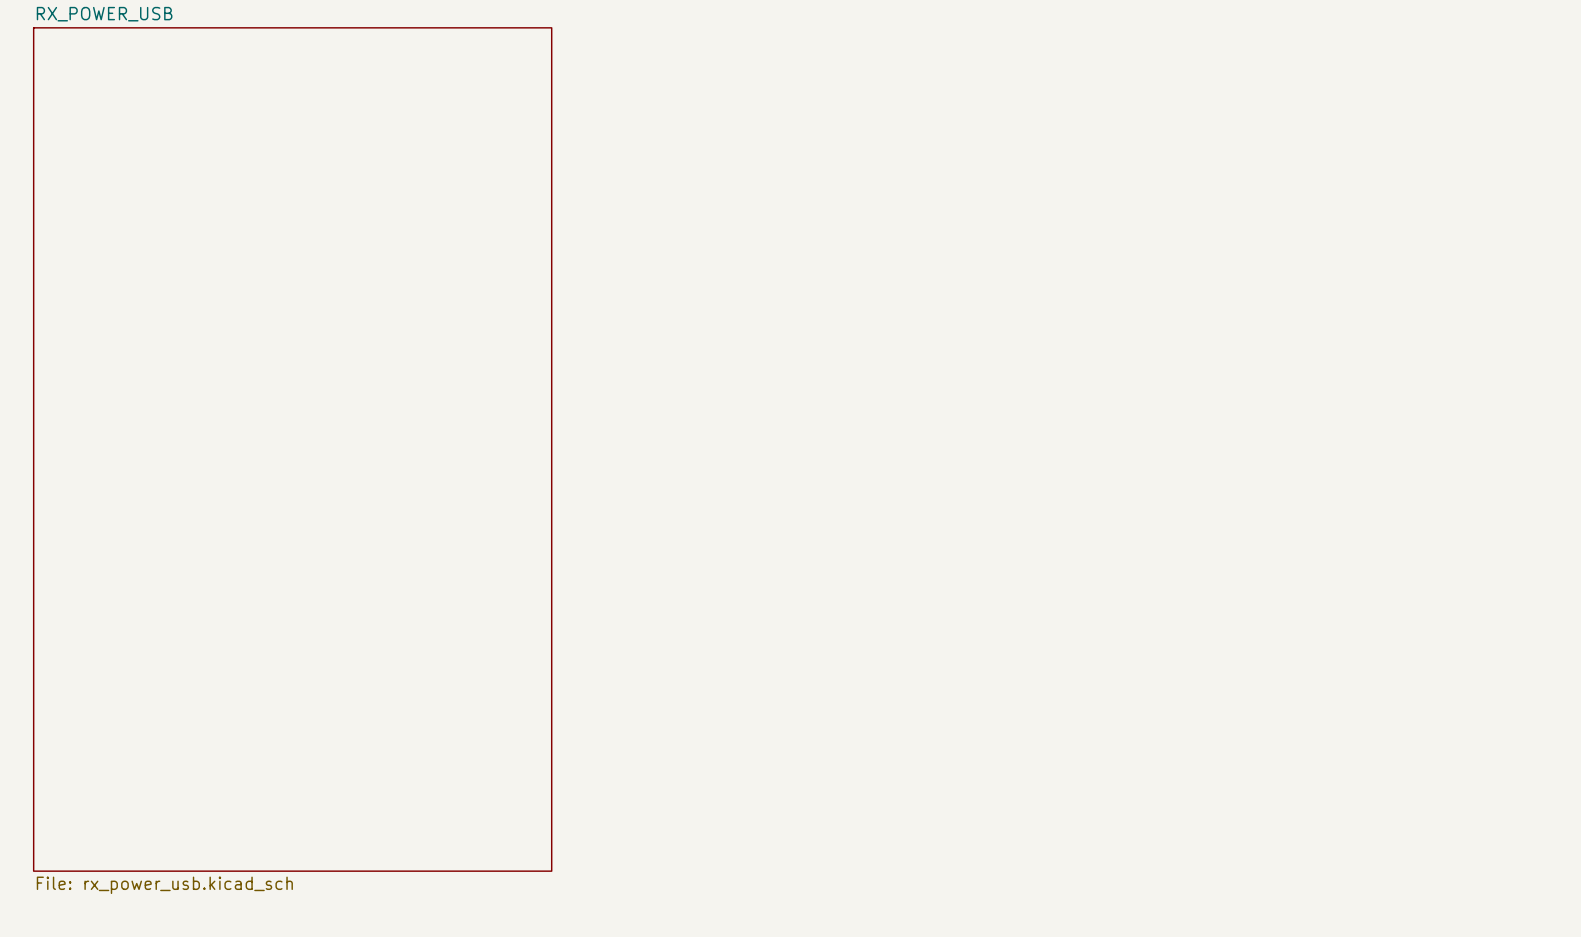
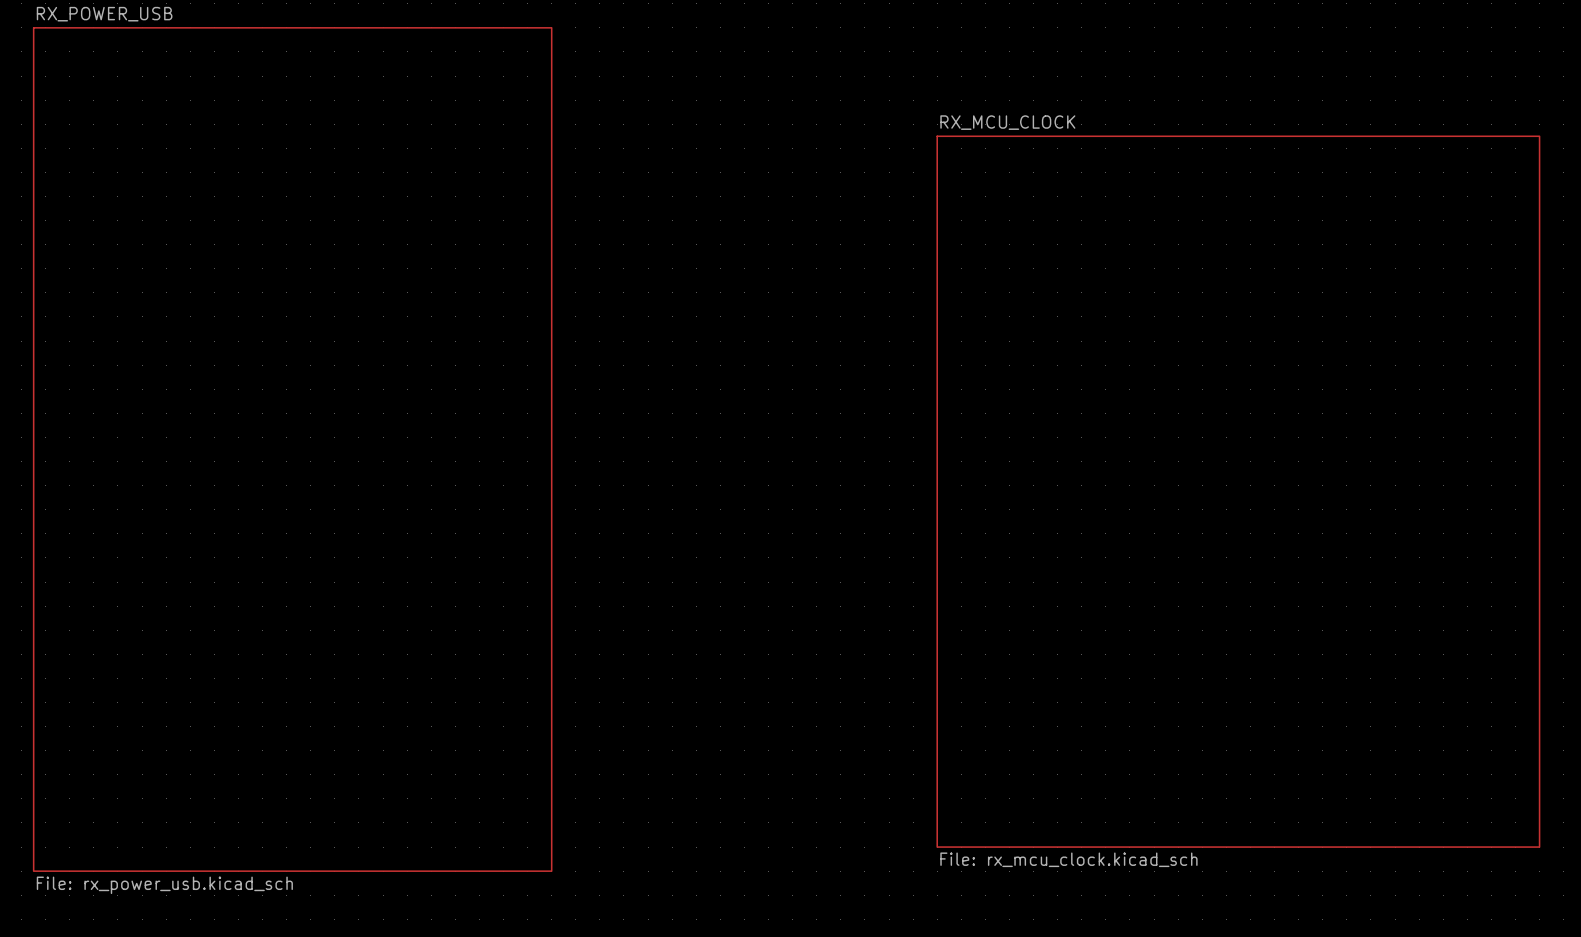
sheet RX_MCU_CLOCK: none -> File: rx_mcu_clock.kicad_sch (1238, 491)

